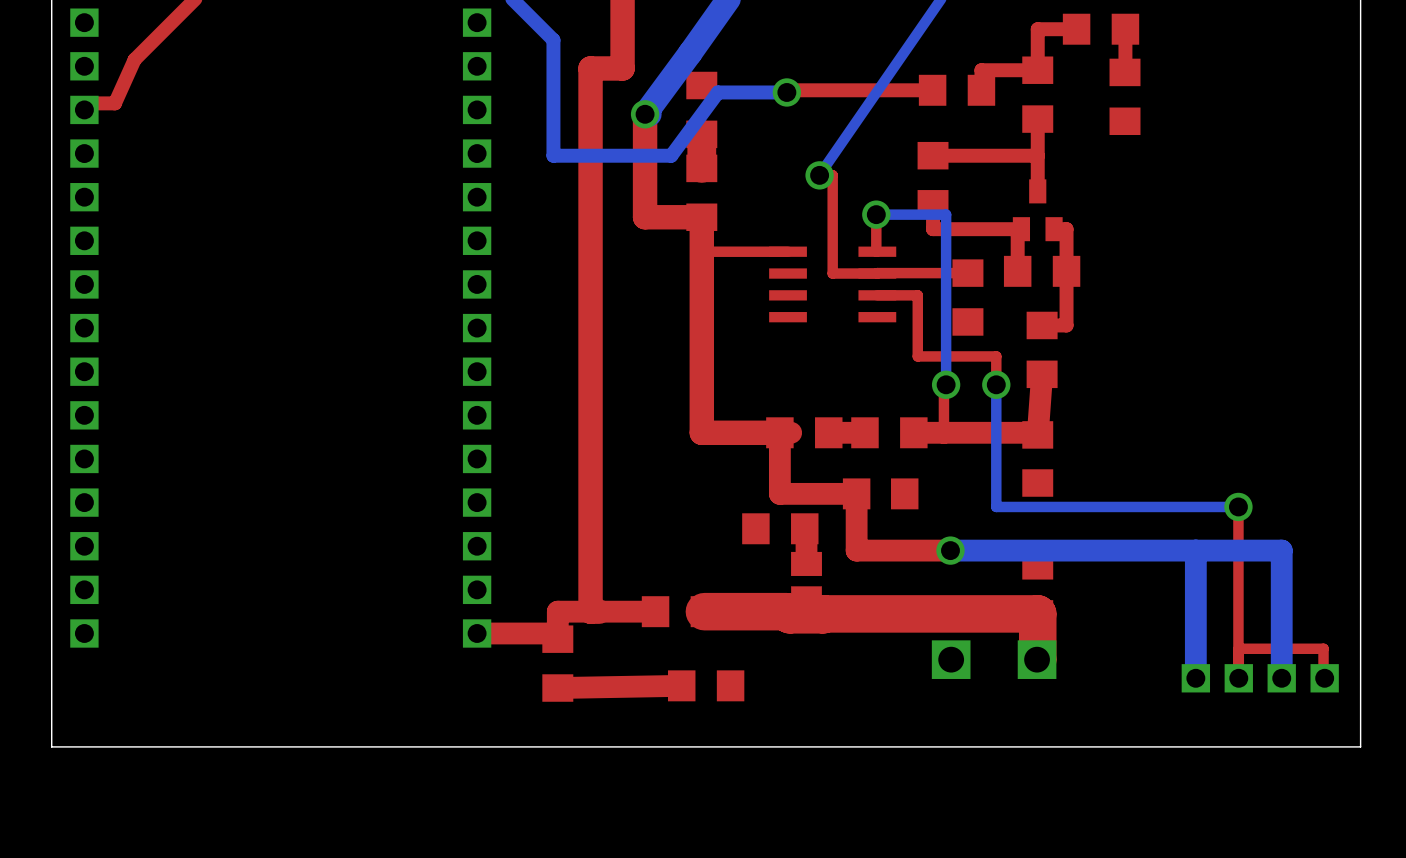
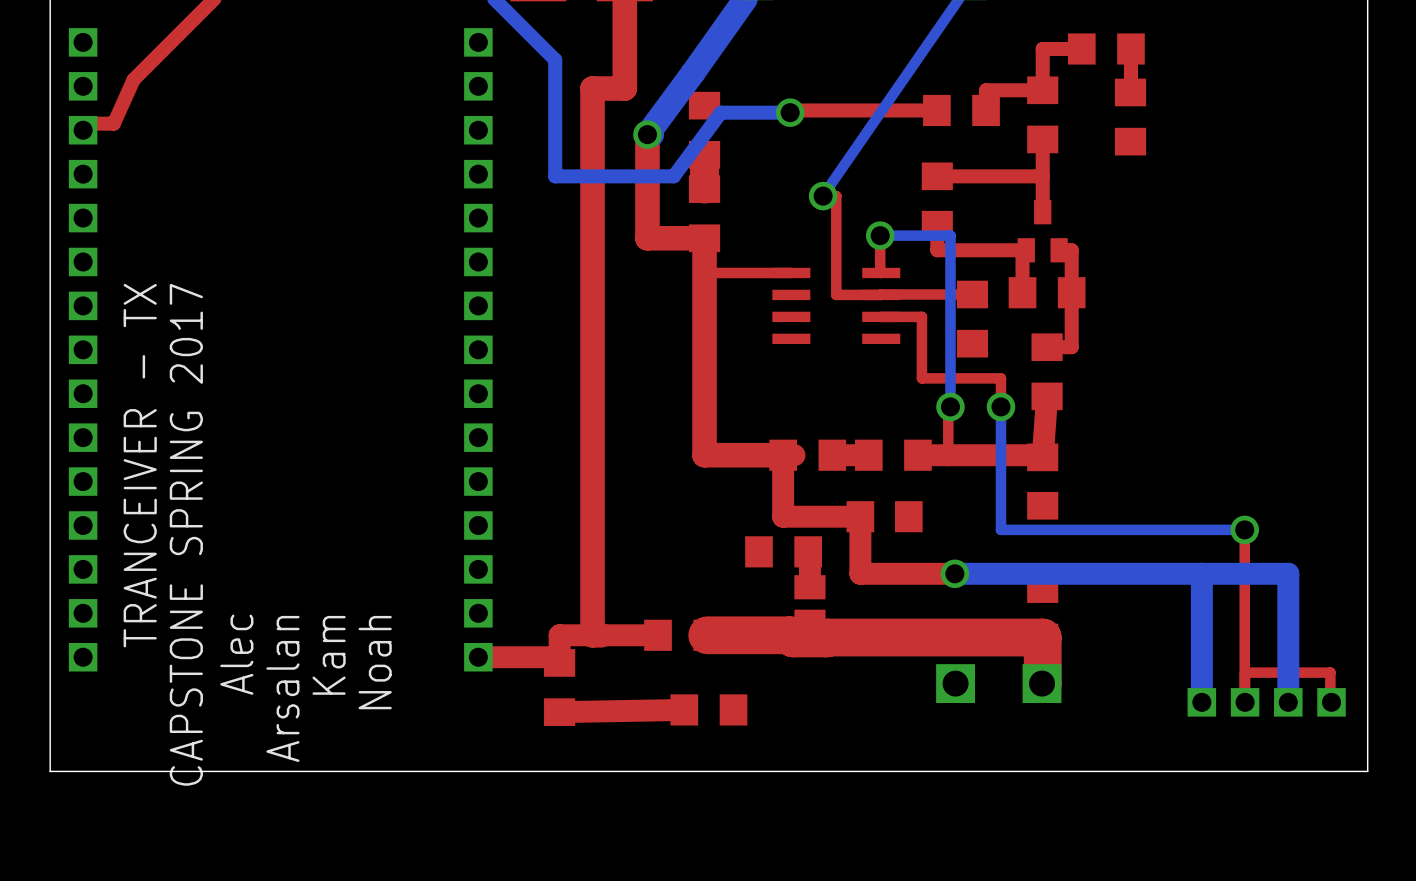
text: none -> TRANCEIVER - TX (140, 465)
text: none -> CAPSTONE SPRING 2017 (186, 534)
text: none -> Alec (236, 654)
text: none -> Kam (329, 655)
text: none -> Noah (375, 662)
text: none -> Arsalan (282, 688)

